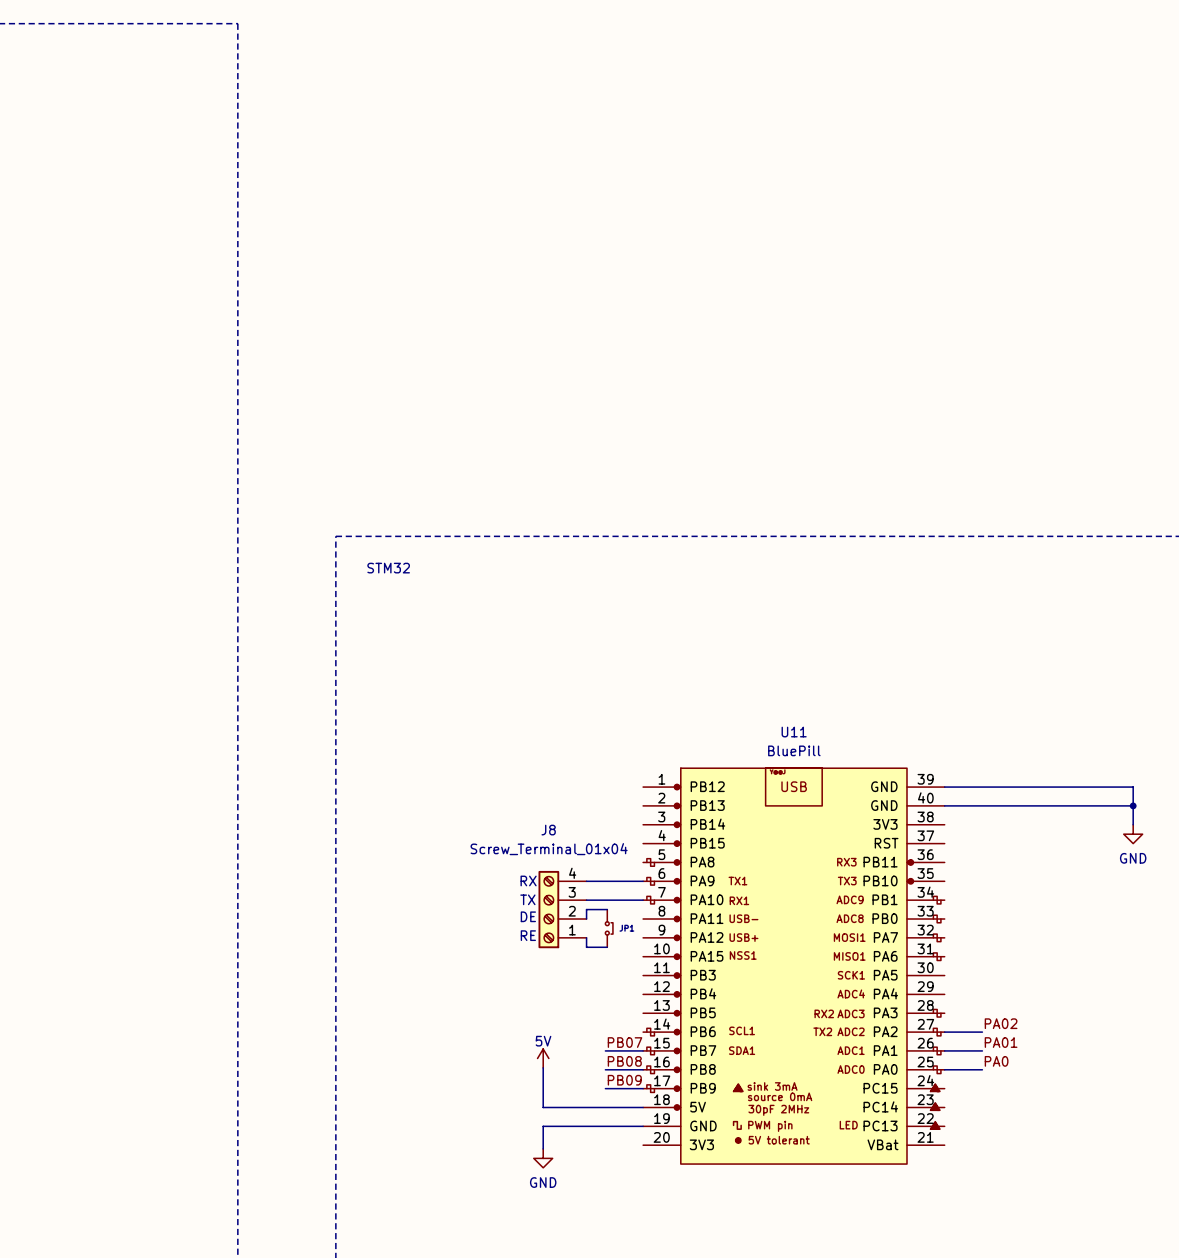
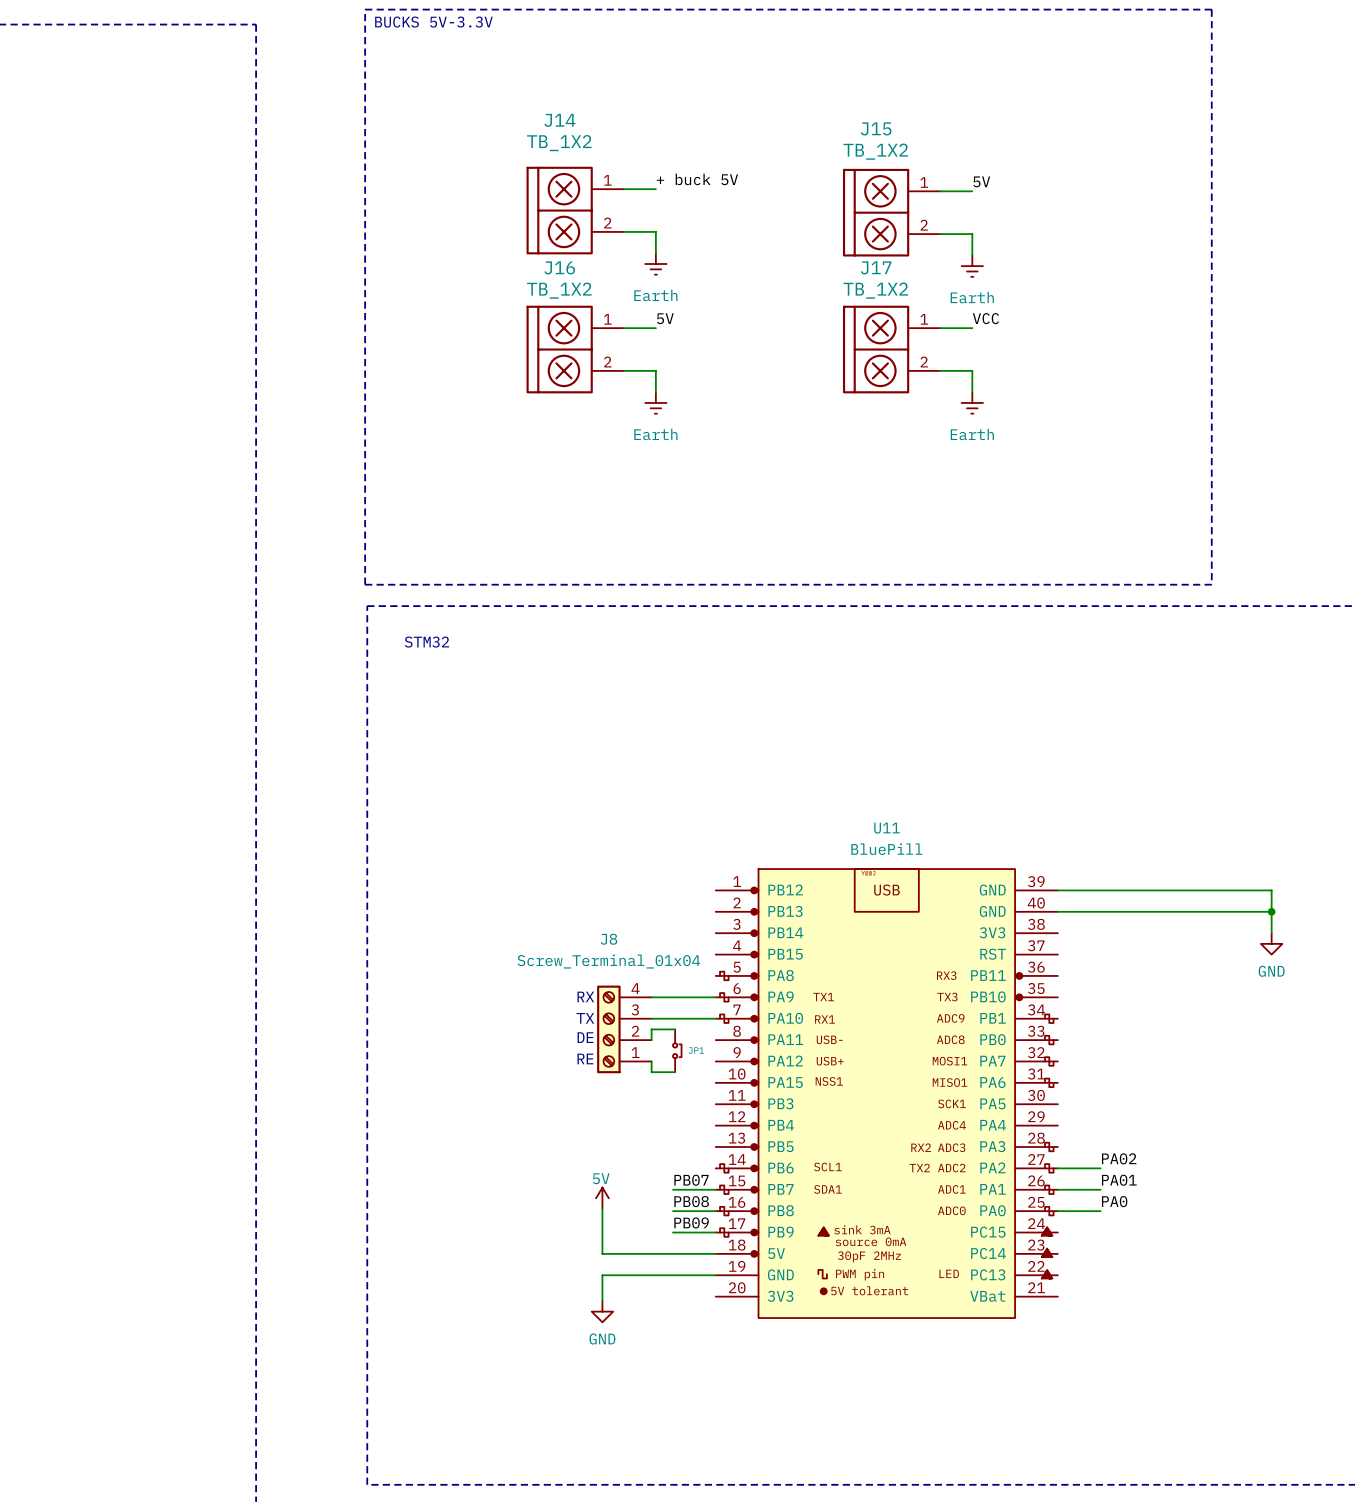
line: none -> (365, 9) (1211, 9) (1211, 584) (365, 584) (365, 9)
text: none -> BUCKS 5V-3.3V (433, 22)
label: none -> + buck 5V (697, 179)
label: none -> 5V (981, 181)
wire: none -> (623, 189) (655, 189)
wire: none -> (940, 191) (972, 191)
J14: none -> TB_1X2 (575, 210)
J15: none -> TB_1X2 (891, 212)
wire: none -> (623, 231) (655, 231) (655, 253)
wire: none -> (940, 234) (972, 234) (972, 255)
power symbol: none -> Earth (655, 264)
power symbol: none -> Earth (972, 266)
label: none -> 5V (665, 318)
label: none -> VCC (985, 318)
wire: none -> (623, 328) (655, 328)
wire: none -> (940, 328) (972, 328)
J16: none -> TB_1X2 (575, 349)
J17: none -> TB_1X2 (891, 349)
wire: none -> (623, 370) (655, 370) (655, 392)
wire: none -> (940, 370) (972, 370) (972, 392)
power symbol: none -> Earth (655, 402)
power symbol: none -> Earth (972, 402)

